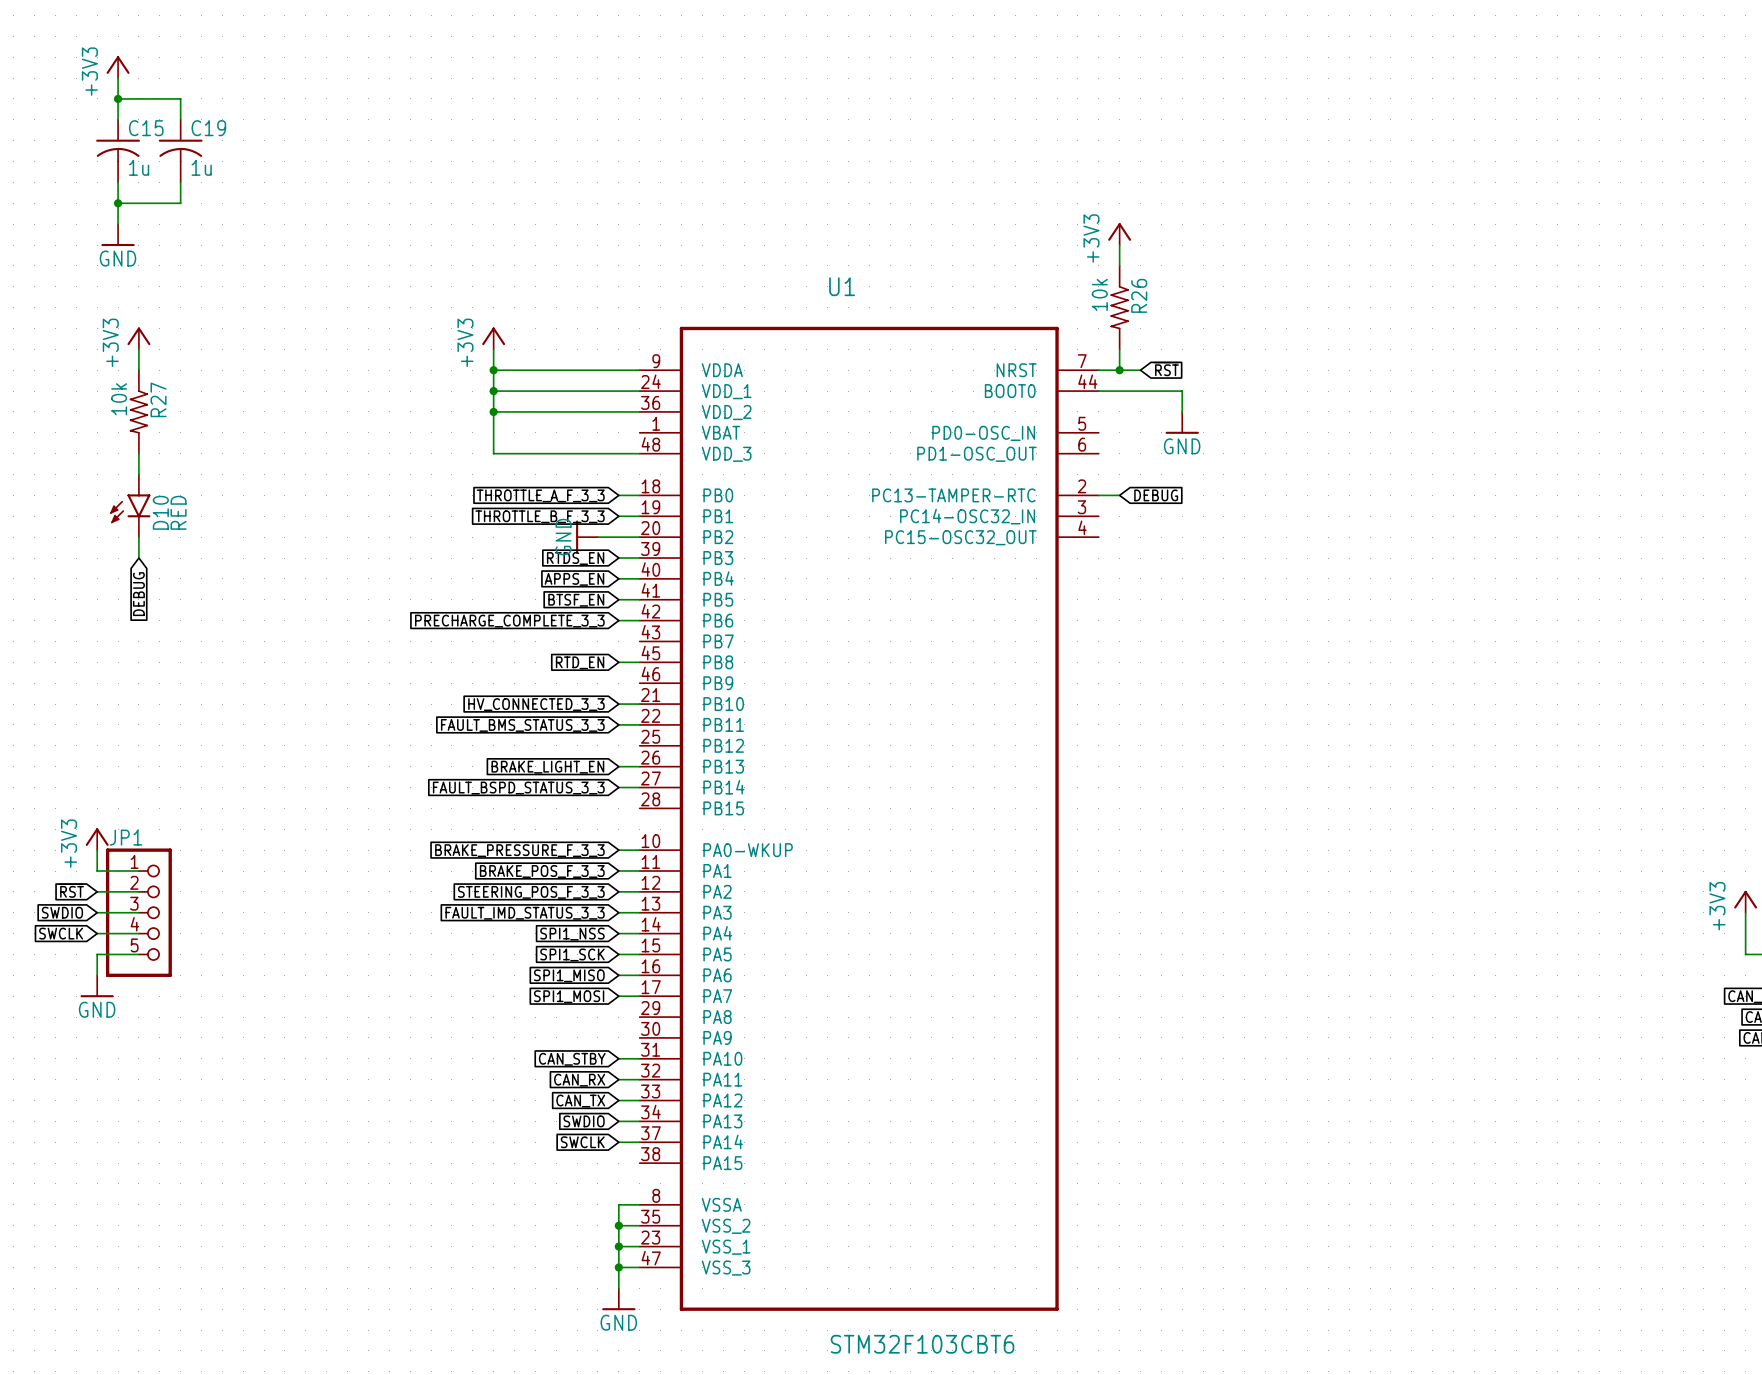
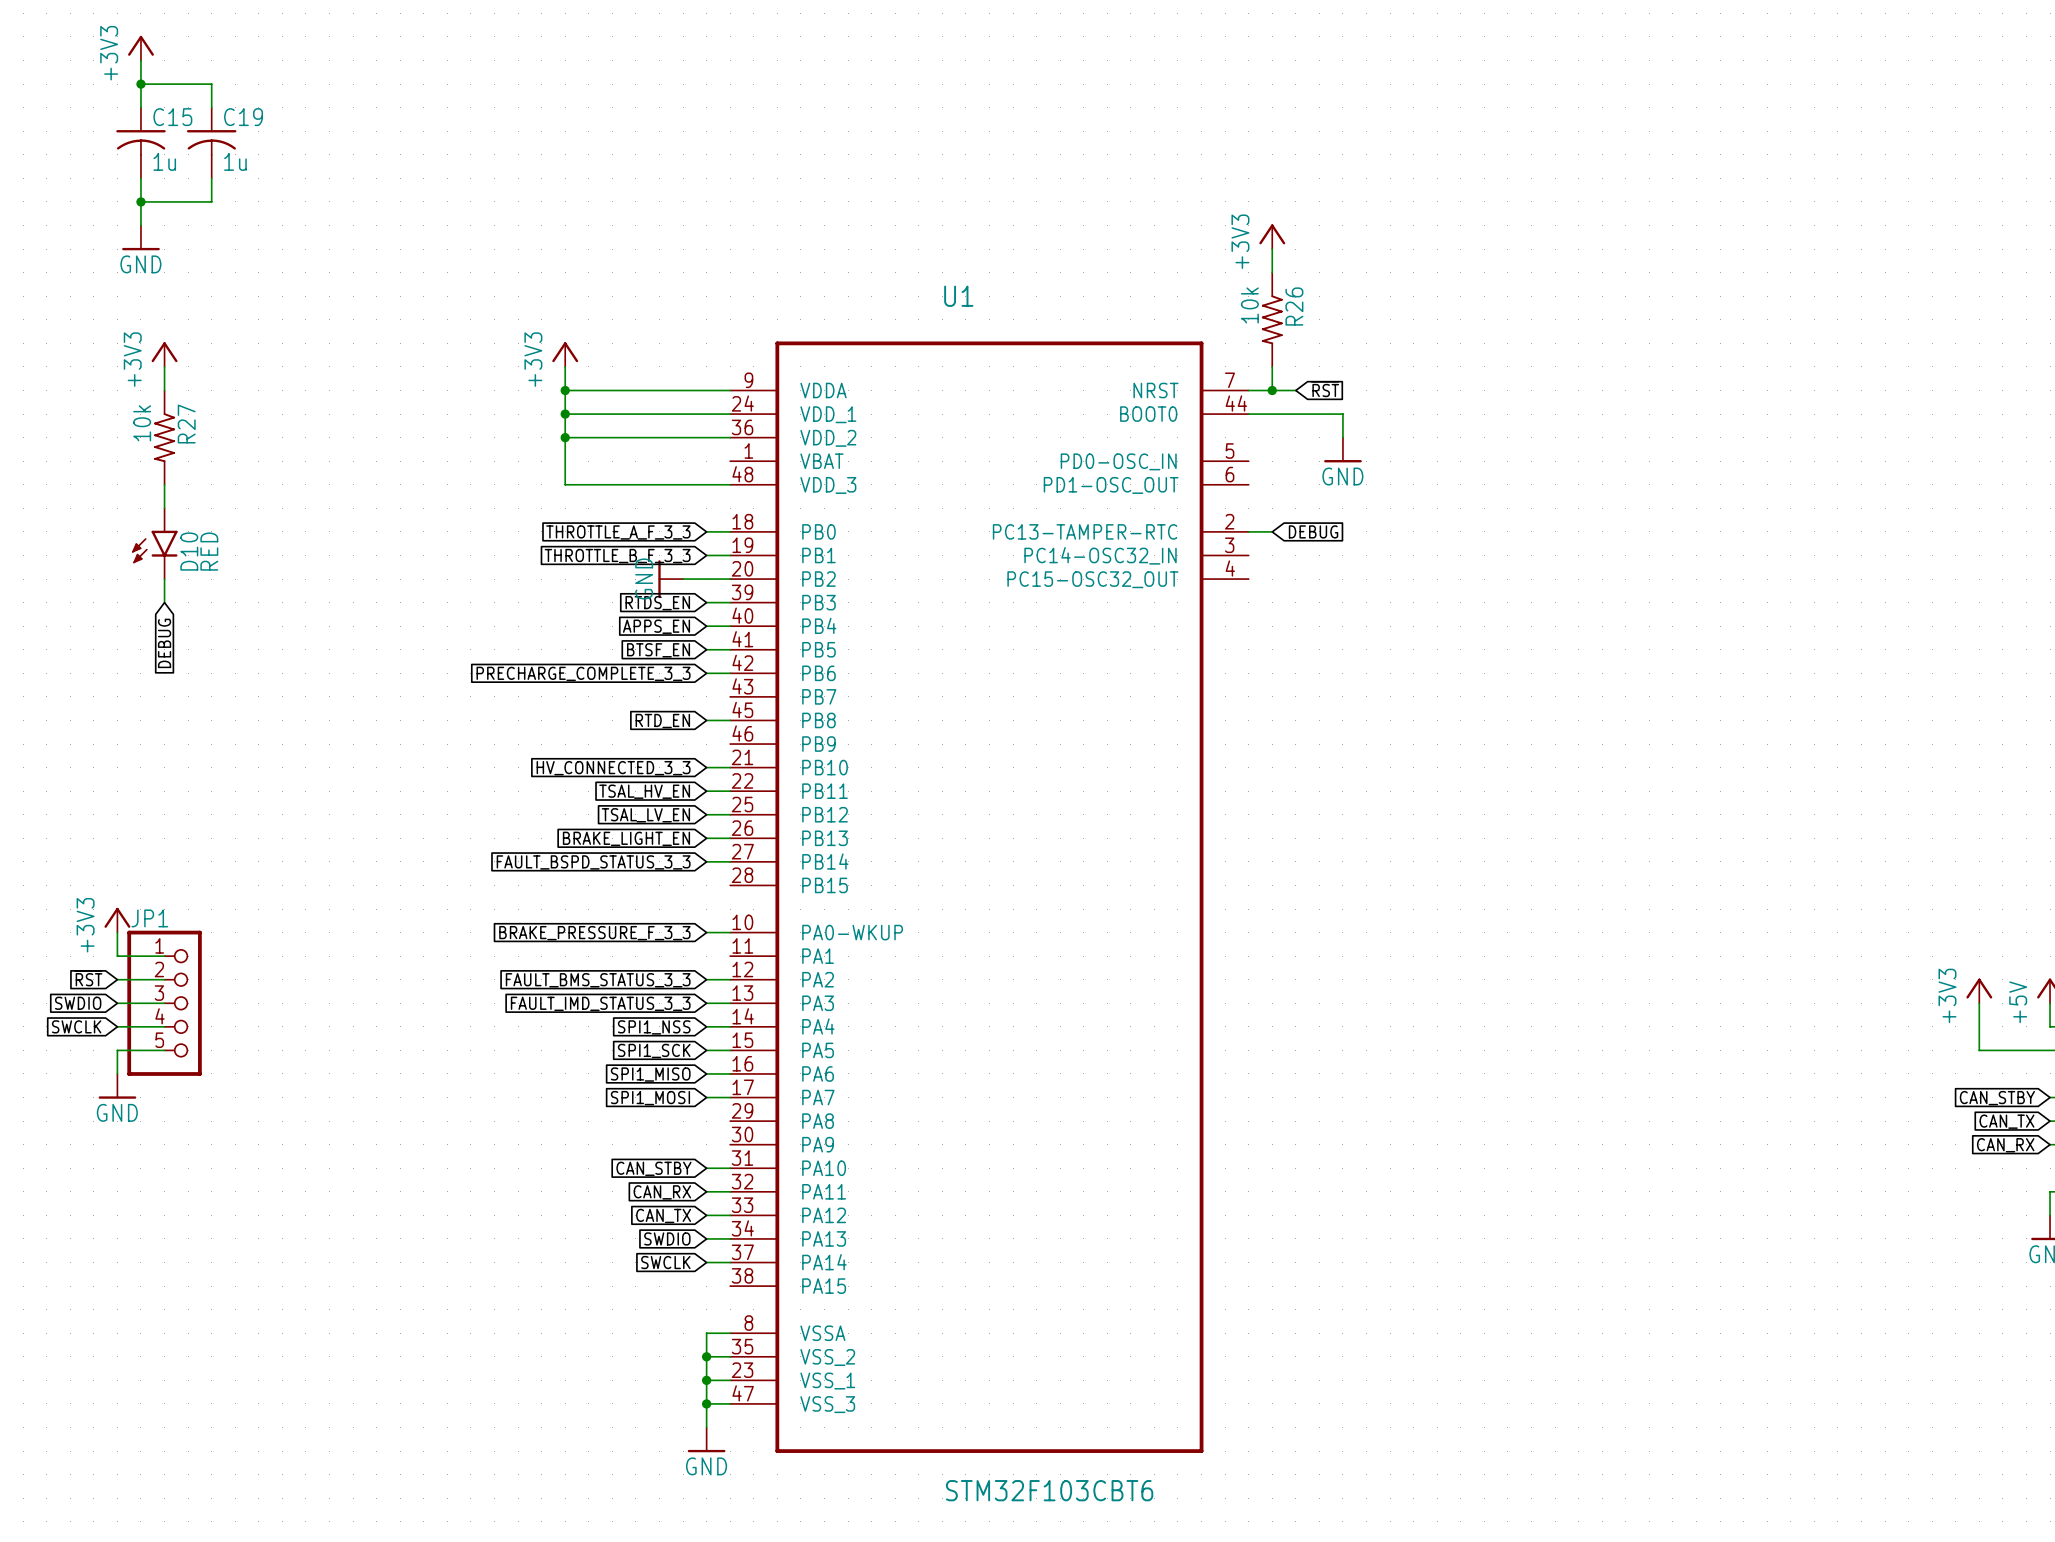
global label: FAULT_BMS_STATUS_3_3 (522, 725) -> TSAL_HV_EN (644, 791)
global label: none -> TSAL_LV_EN (645, 815)
global label: BRAKE_POS_F_3_3 (542, 871) -> none
wire: (618, 871) (639, 871) -> (706, 814) (730, 814)
global label: STEERING_POS_F_3_3 (531, 892) -> FAULT_BMS_STATUS_3_3 (598, 980)

